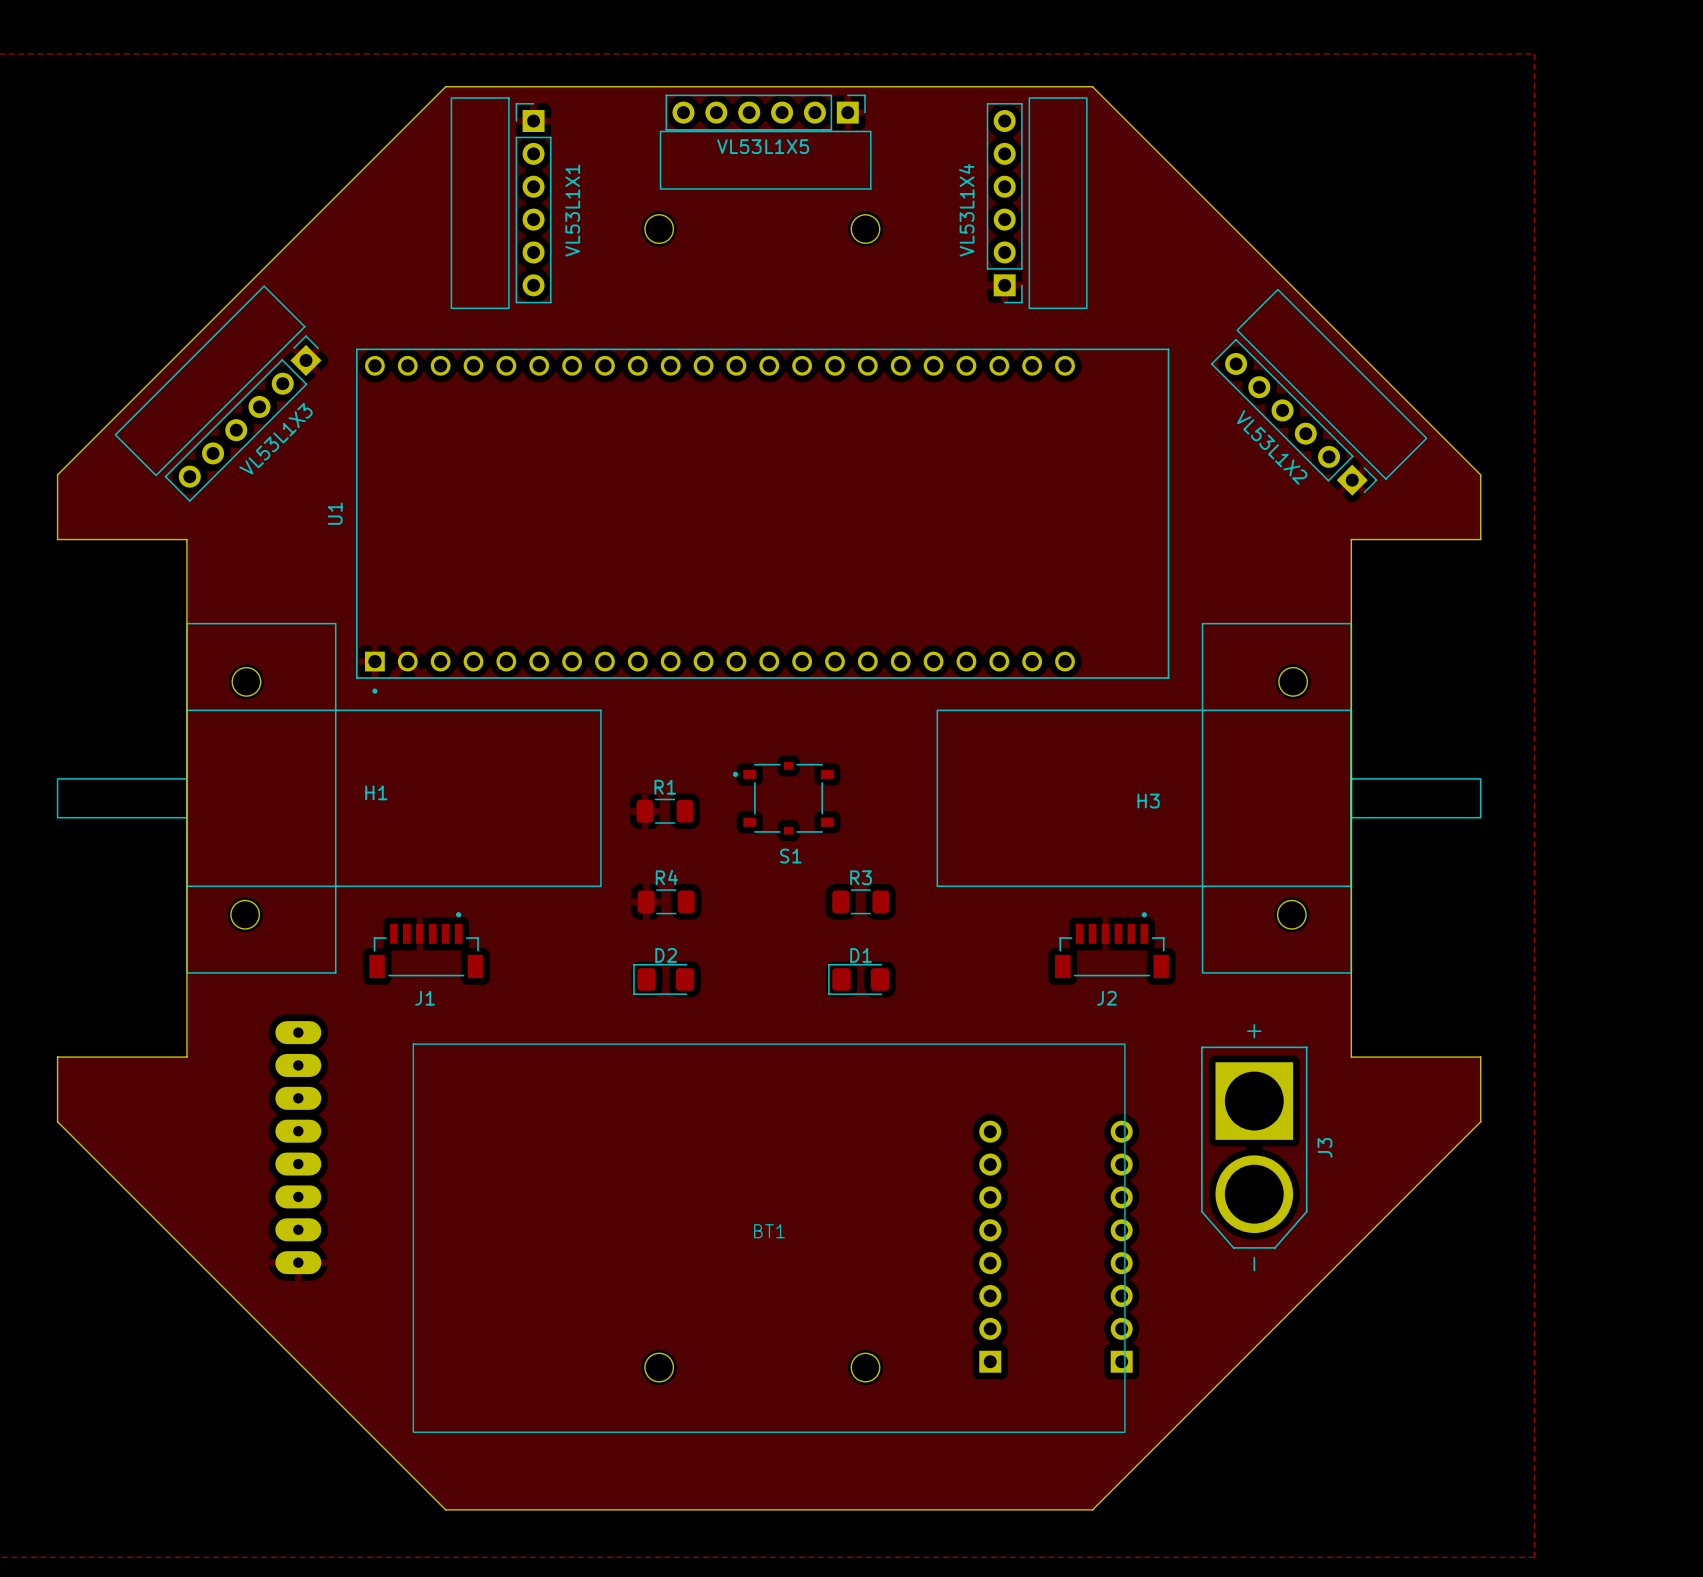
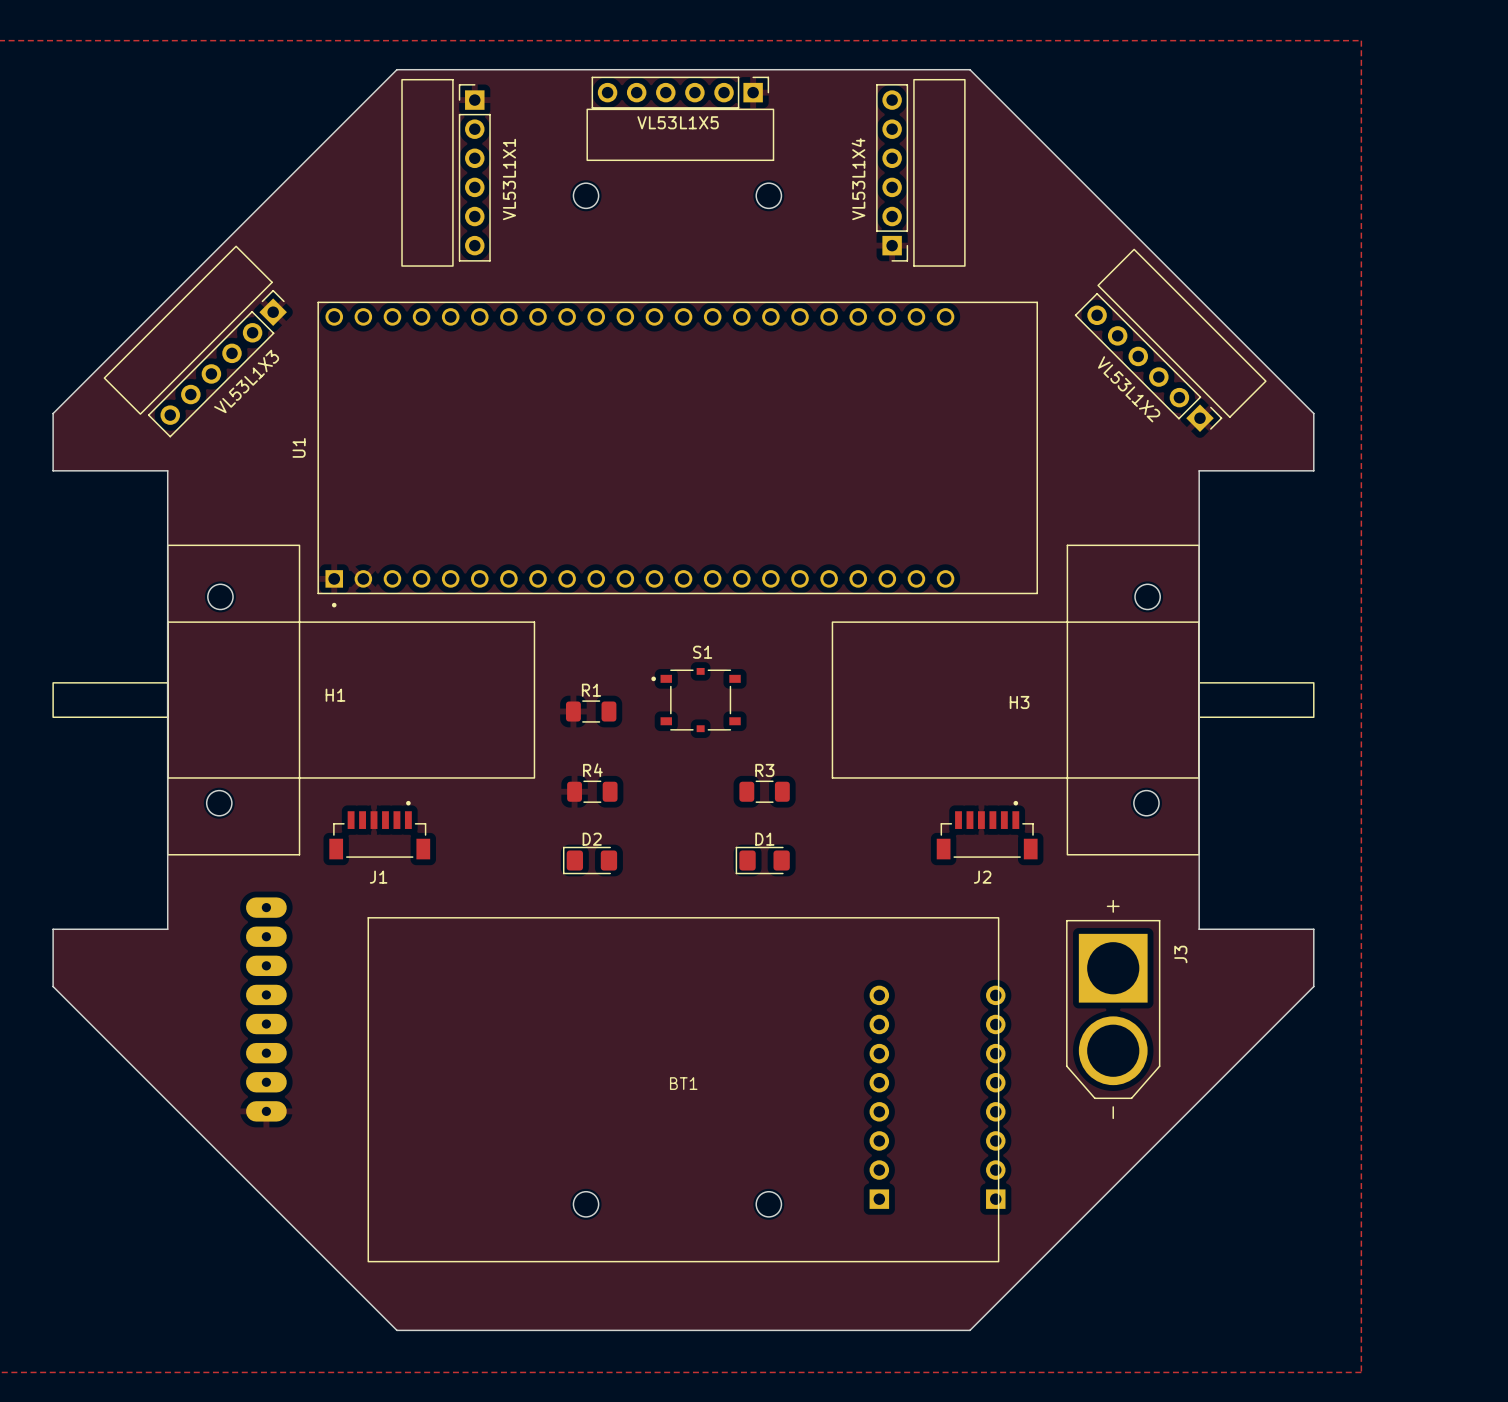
S1 name position: S1 (790, 856) -> S1 (702, 652)
J3 name position: J3 (1324, 1147) -> J3 (1180, 954)

